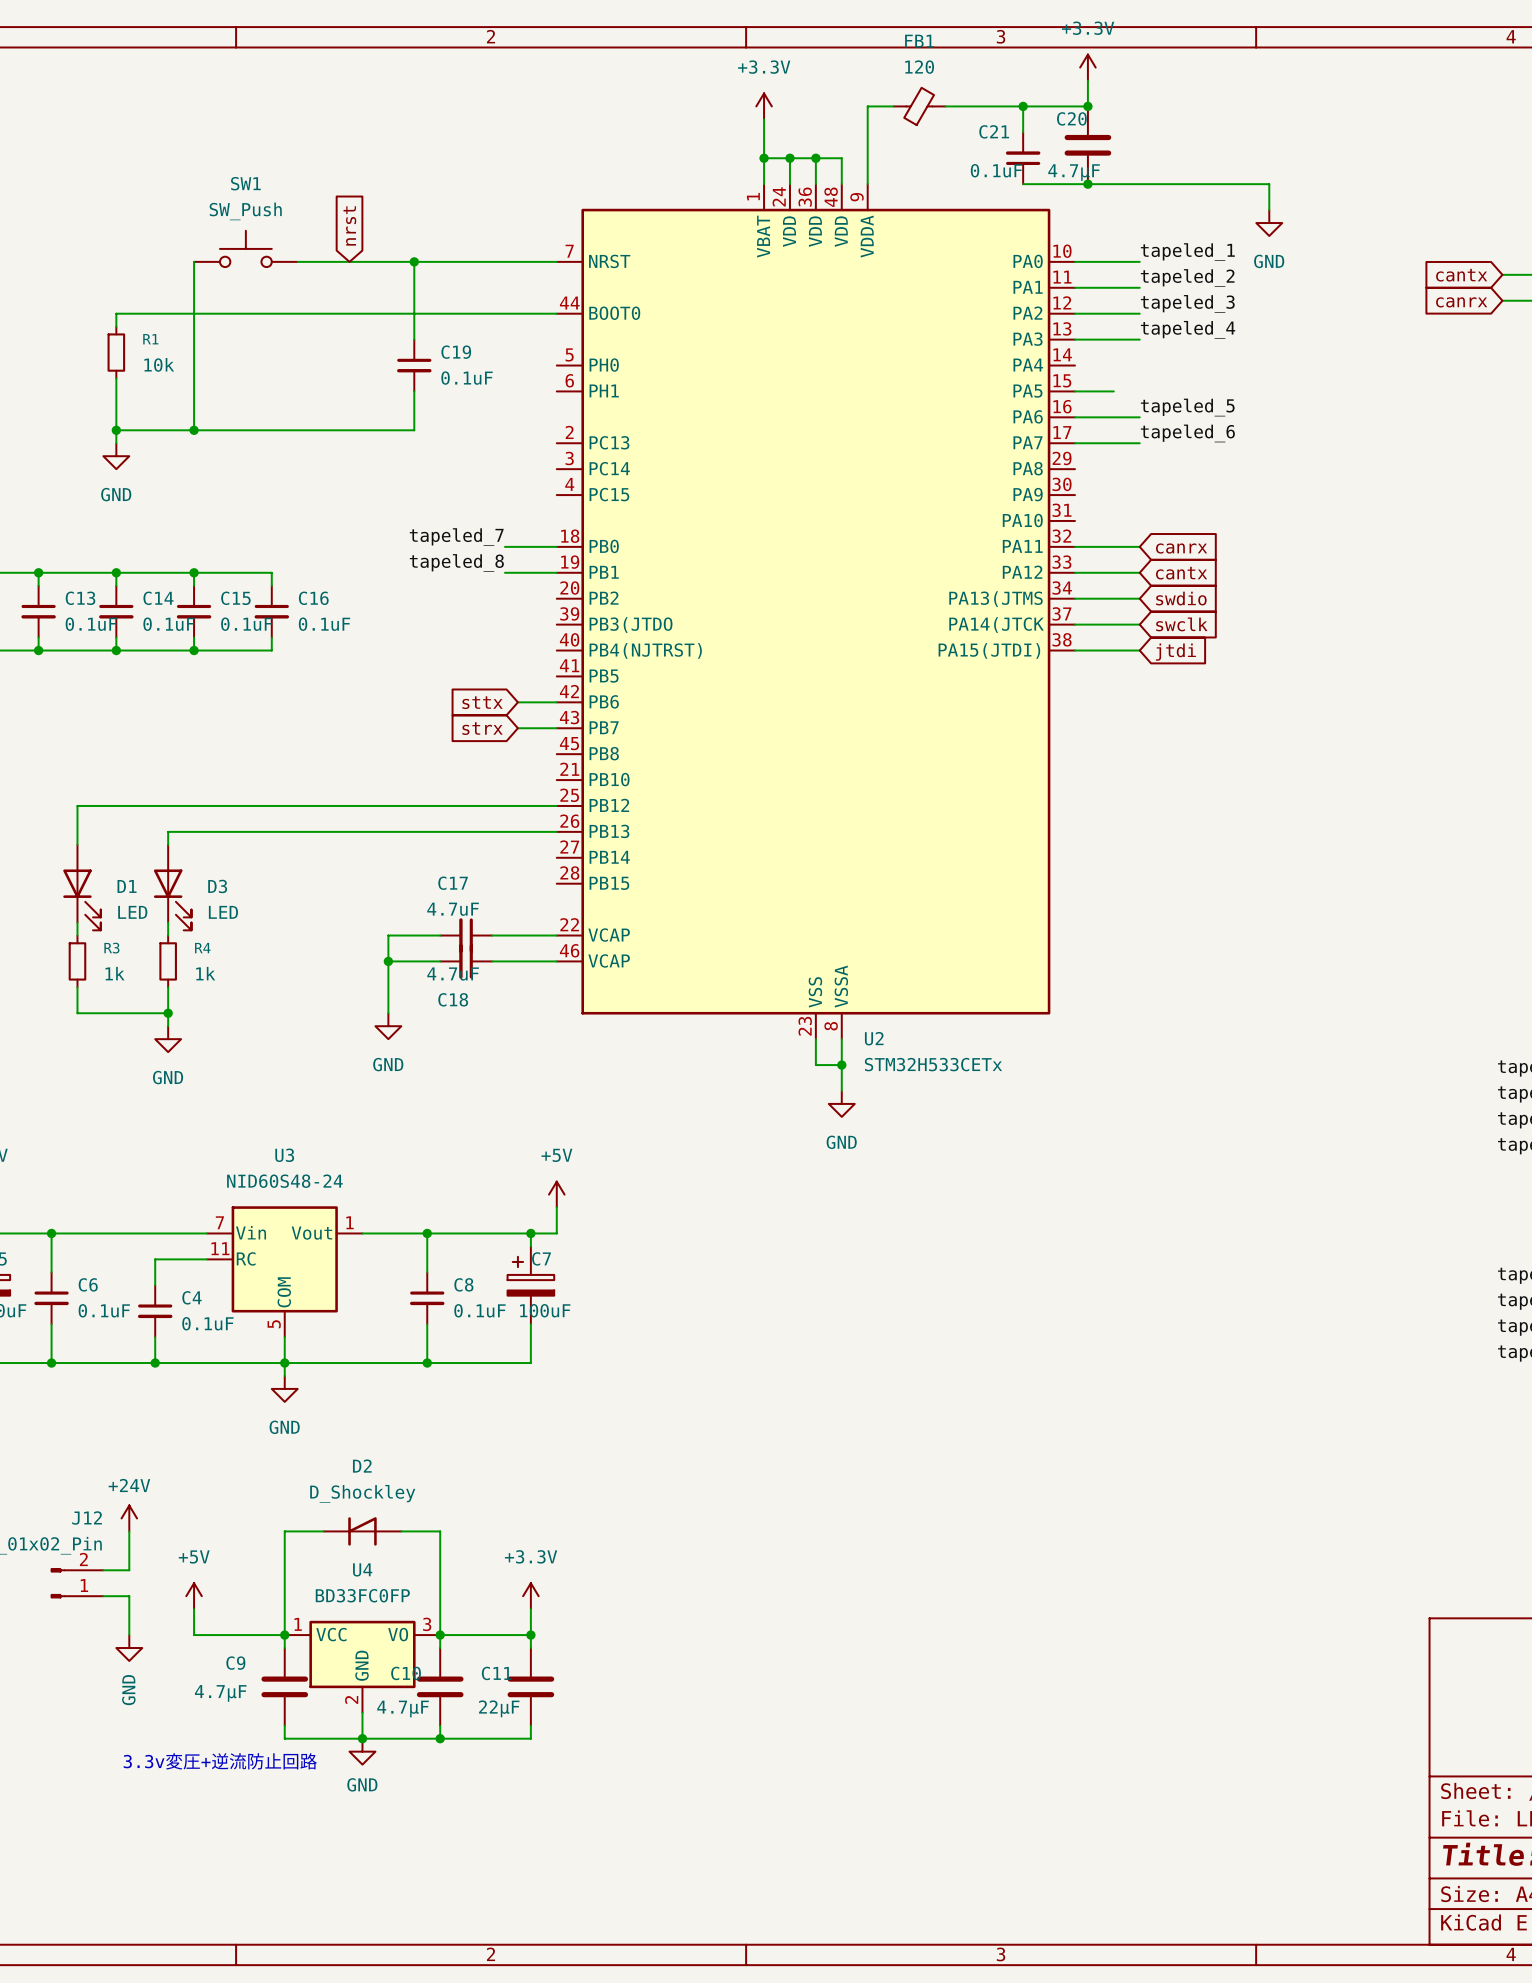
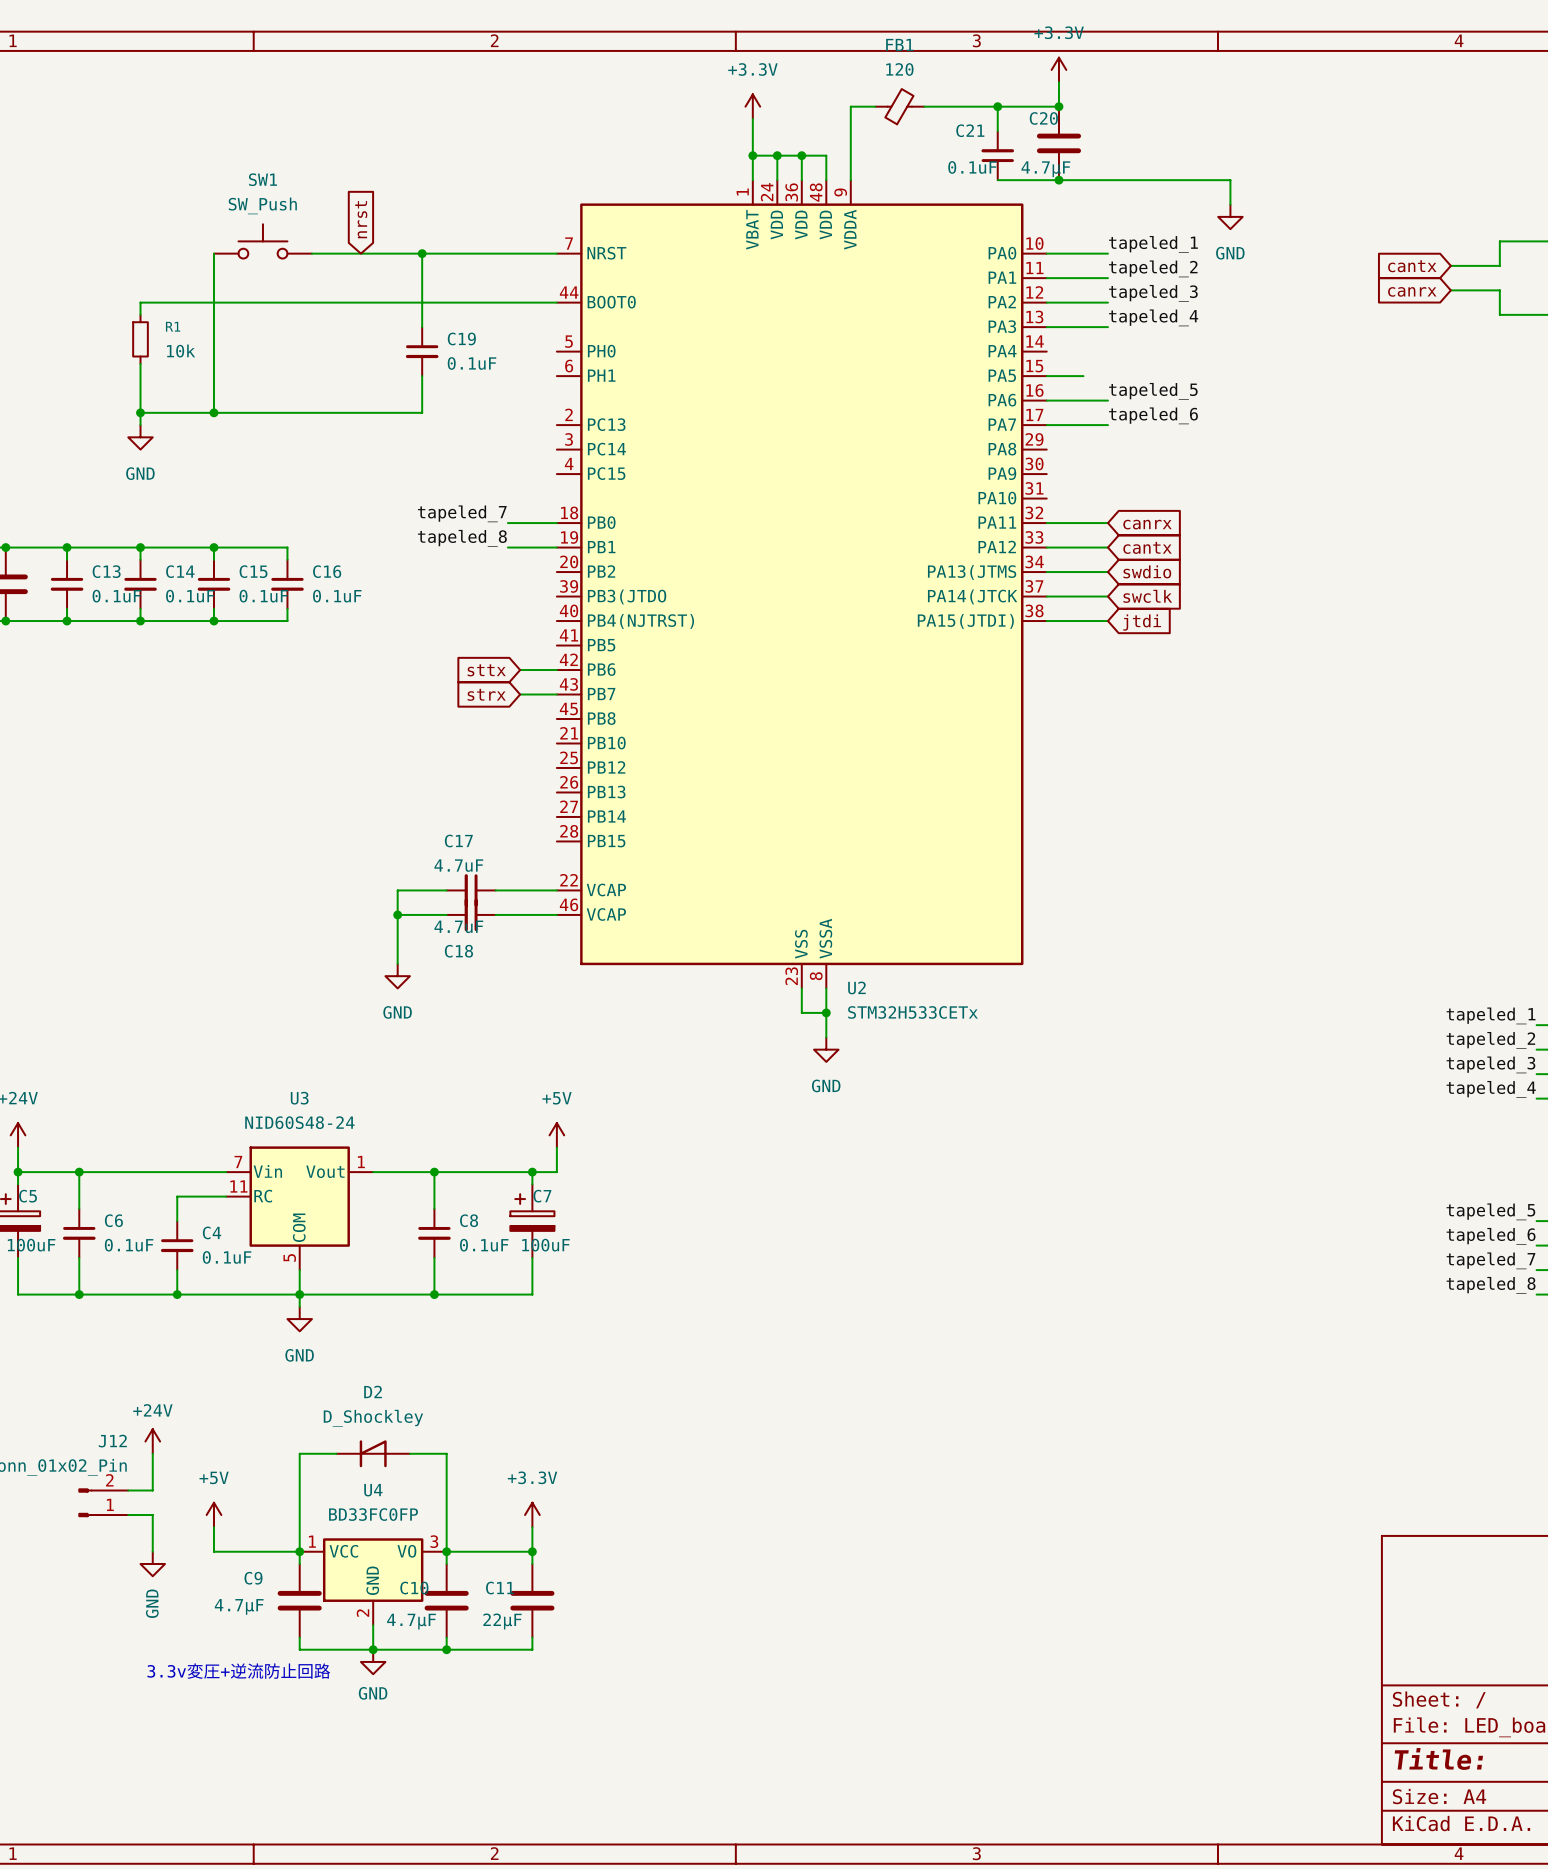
wire: (556, 805) (77, 805) (77, 844) -> none
wire: (556, 831) (168, 831) (168, 844) -> none
D1: LED (82, 887) -> none
D3: LED (172, 887) -> none
wire: (77, 922) (77, 935) -> none
wire: (168, 922) (168, 935) -> none
R3: 1k (77, 961) -> none
R4: 1k (168, 961) -> none
wire: (77, 987) (77, 1013) (168, 1013) -> none
wire: (168, 987) (168, 1026) -> none
junction: (168, 1013) -> none
power symbol: GND (168, 1039) -> none

